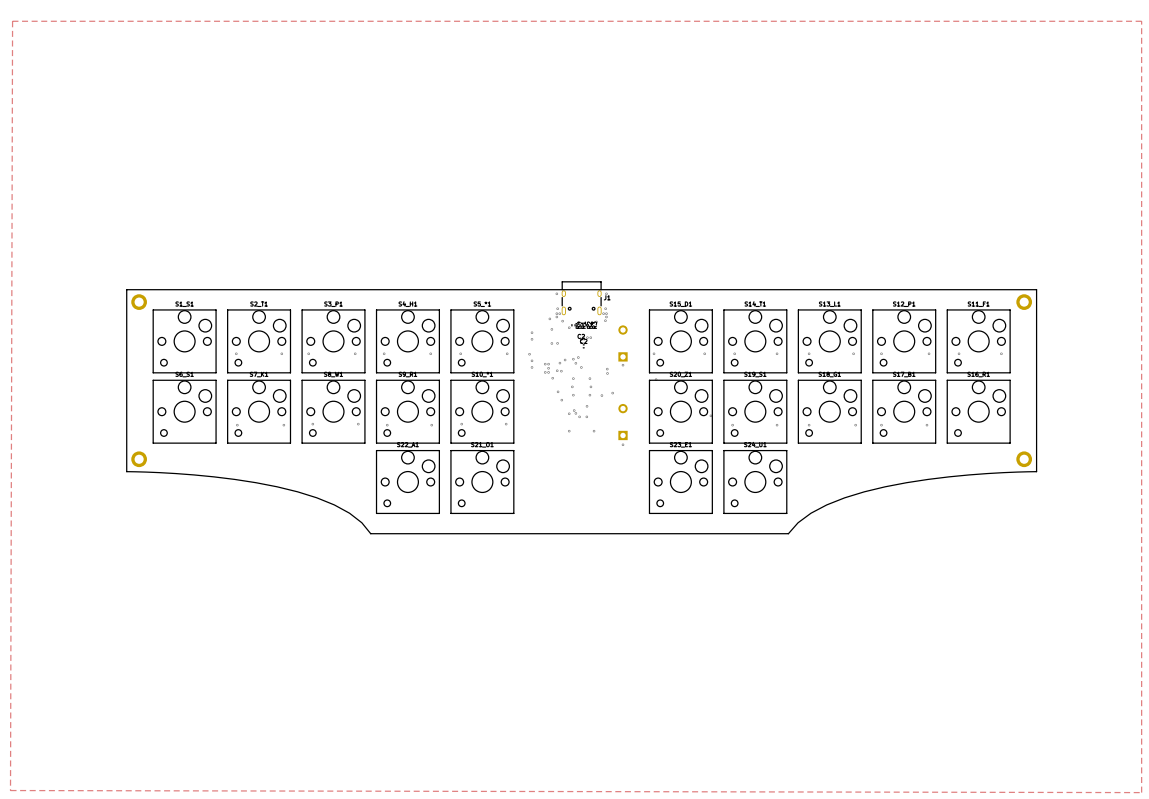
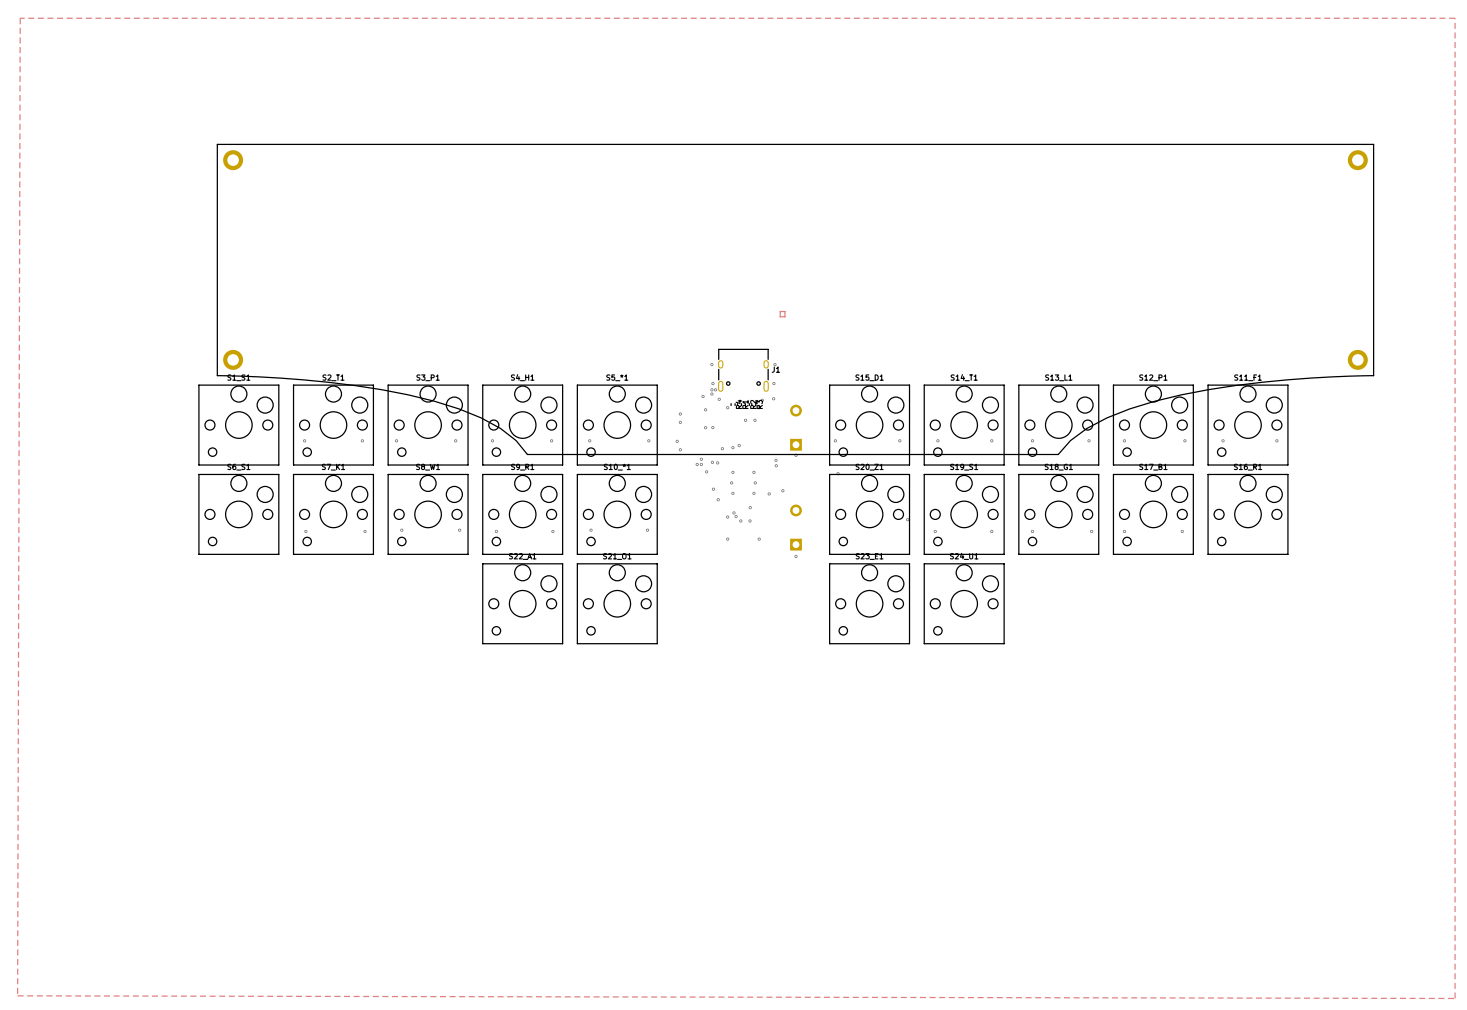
board edge: none -> (217, 144) (1373, 144) (1373, 375) (1262, 382) (1208, 389) (1154, 401) (1106, 417) (1086, 428) (1070, 440) (1058, 454) (527, 454) (516, 440) (500, 428) (481, 417) (434, 401) (381, 389) (328, 382) (217, 375) (217, 144)
part: none -> (233, 160)
part: none -> (1357, 160)
track: none -> (780, 311) (780, 316) (784, 316) (784, 311) (780, 311)
board edge: (126, 289) (1036, 289) (1036, 471) (949, 476) (906, 482) (864, 491) (826, 504) (810, 513) (798, 522) (788, 533) (370, 533) (361, 522) (349, 513) (334, 504) (297, 491) (256, 482) (213, 476) (126, 471) (126, 289) -> none
part position: (139, 302) -> (233, 359)
part position: (1024, 302) -> (1357, 359)
via: (603, 313) -> none
via: (606, 313) -> none
via: (606, 316) -> none
via: (587, 337) -> none
part: (581, 341) -> none
part: (583, 346) -> none
via: (559, 363) -> none
via: (575, 363) -> none
via: (545, 364) -> none
via: (548, 364) -> none
via: (532, 367) -> none
via: (581, 367) -> none
part: (139, 459) -> none
part: (1024, 459) -> none

